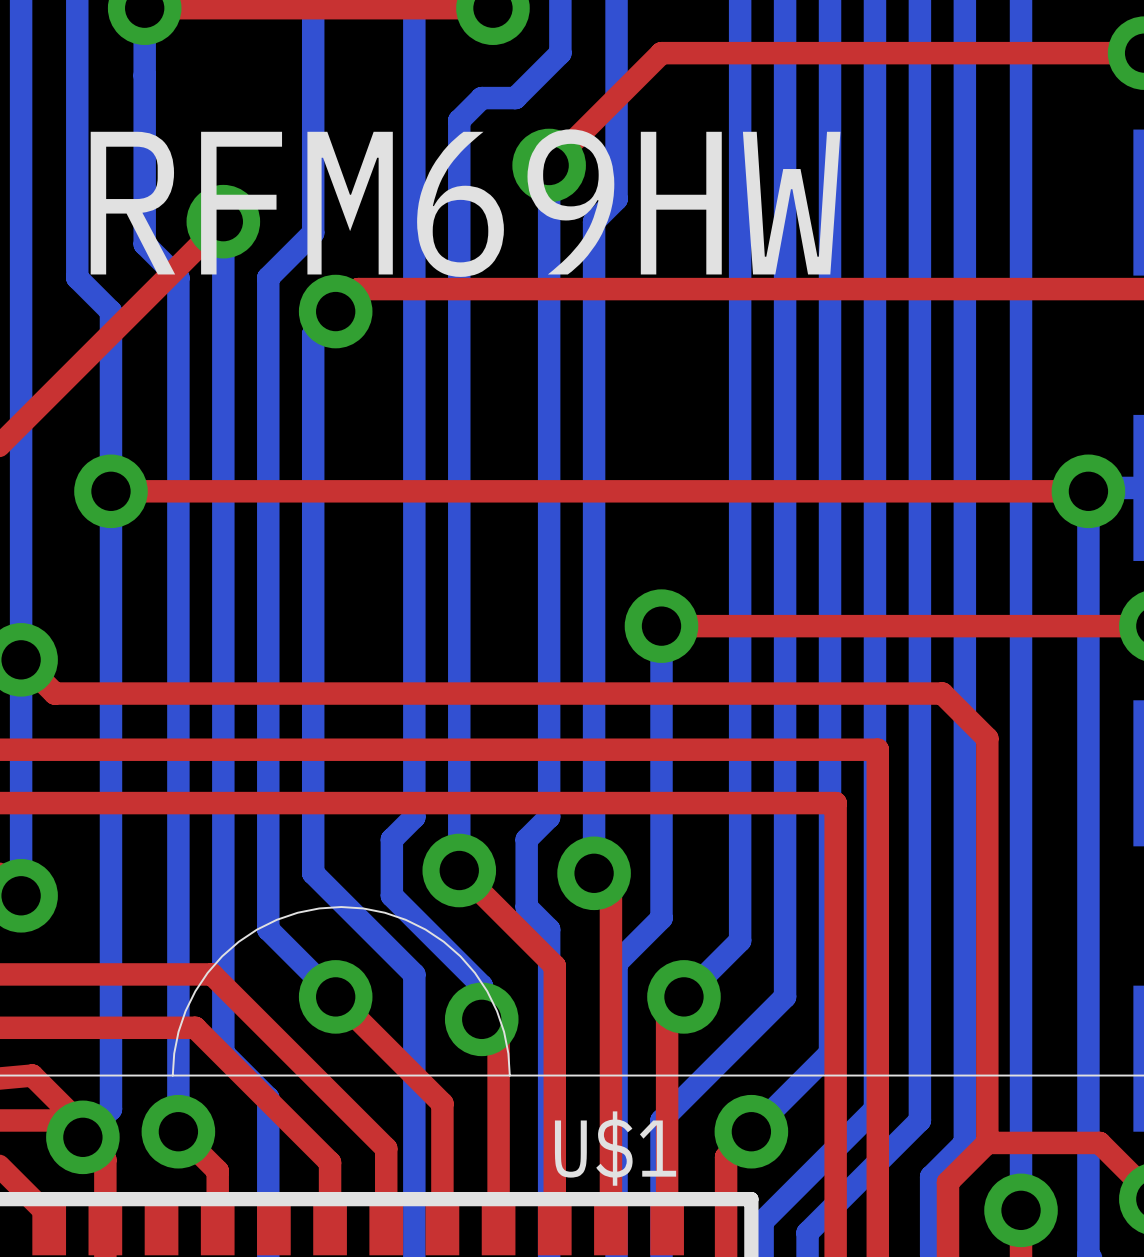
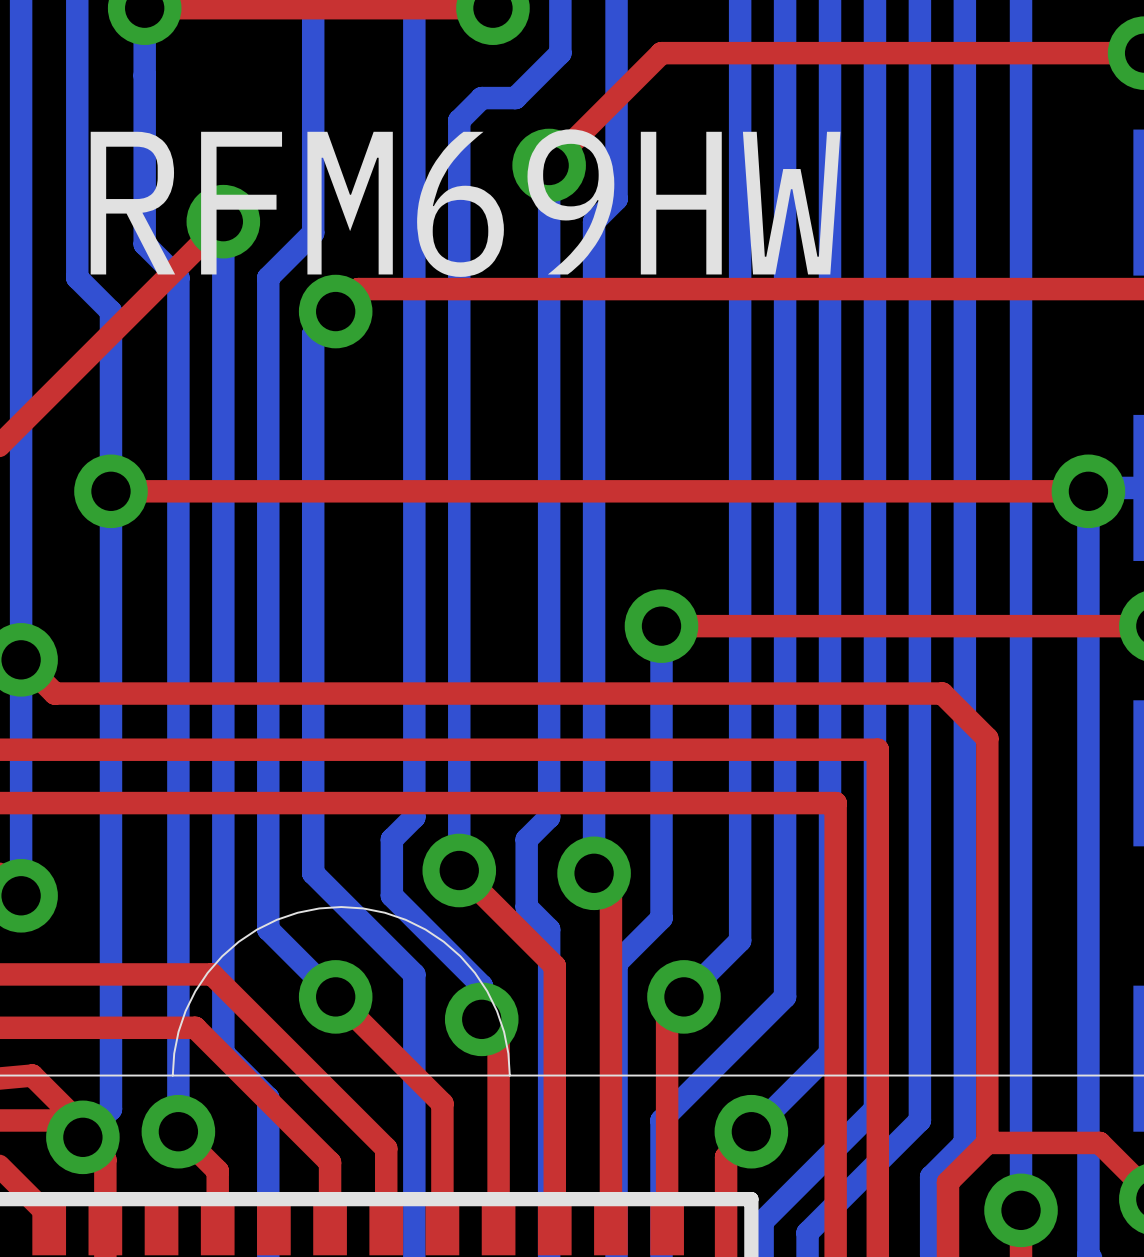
text: U$1 (615, 1148) -> none

